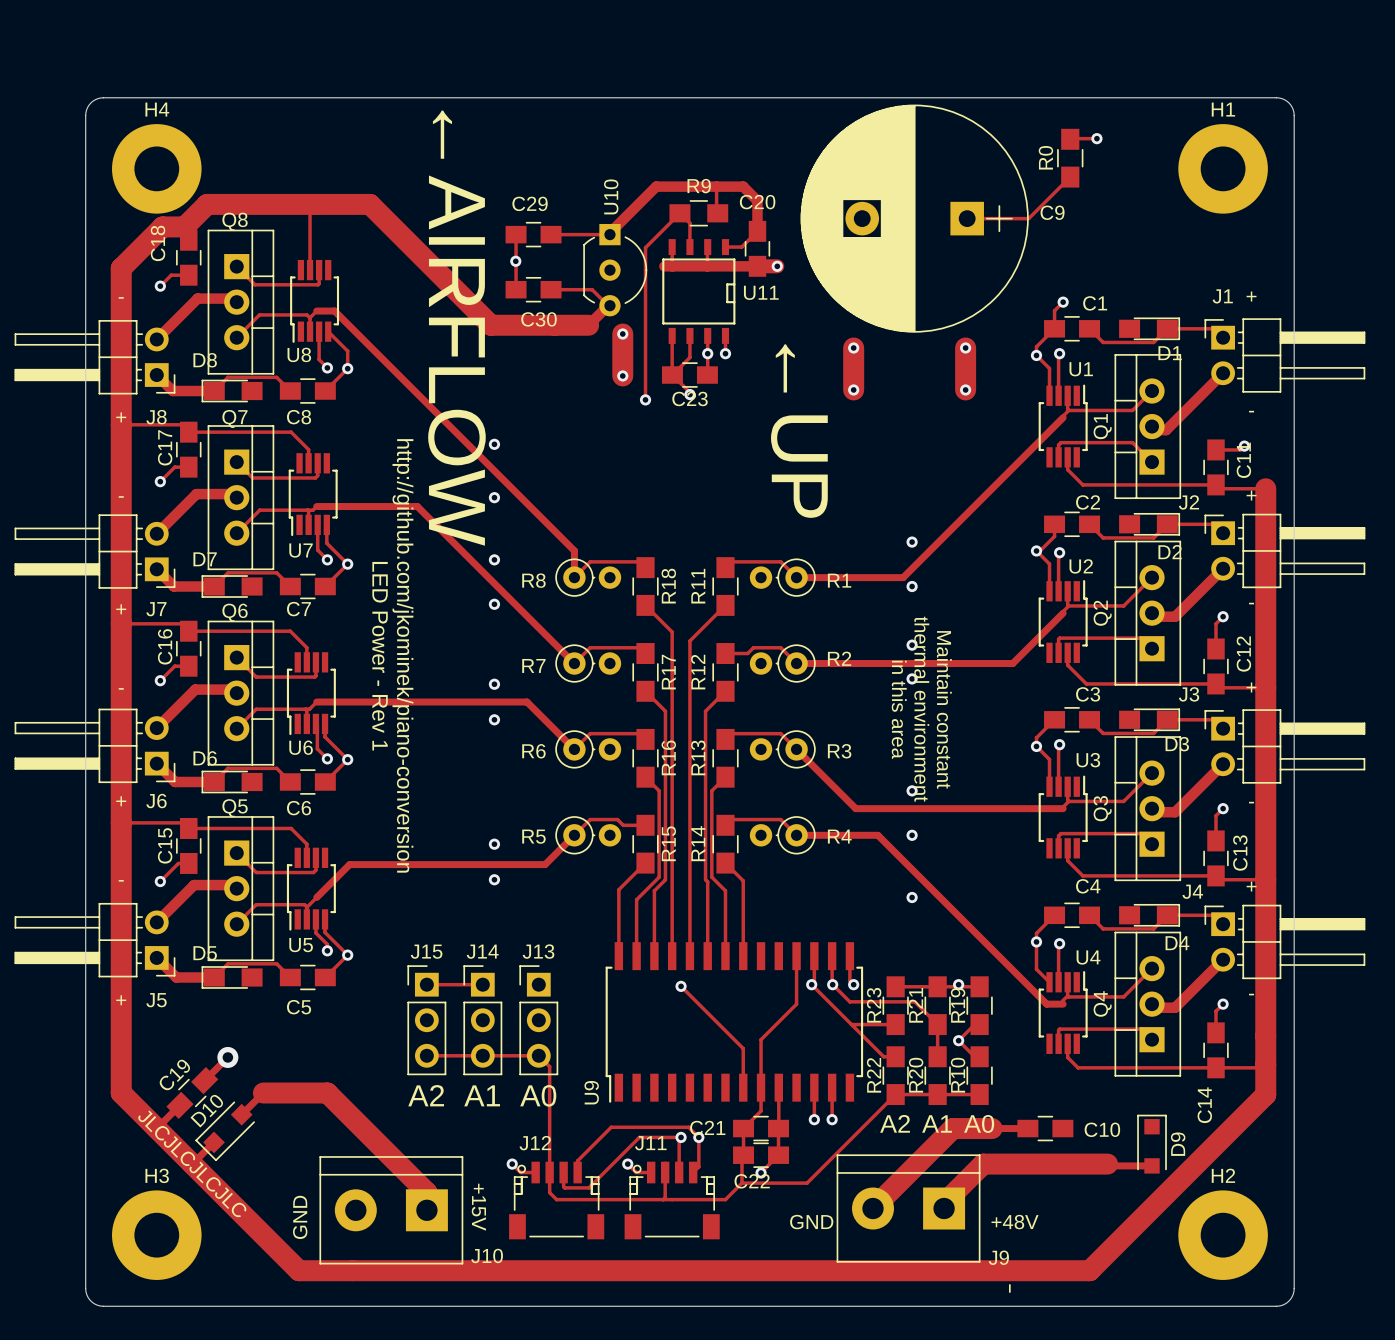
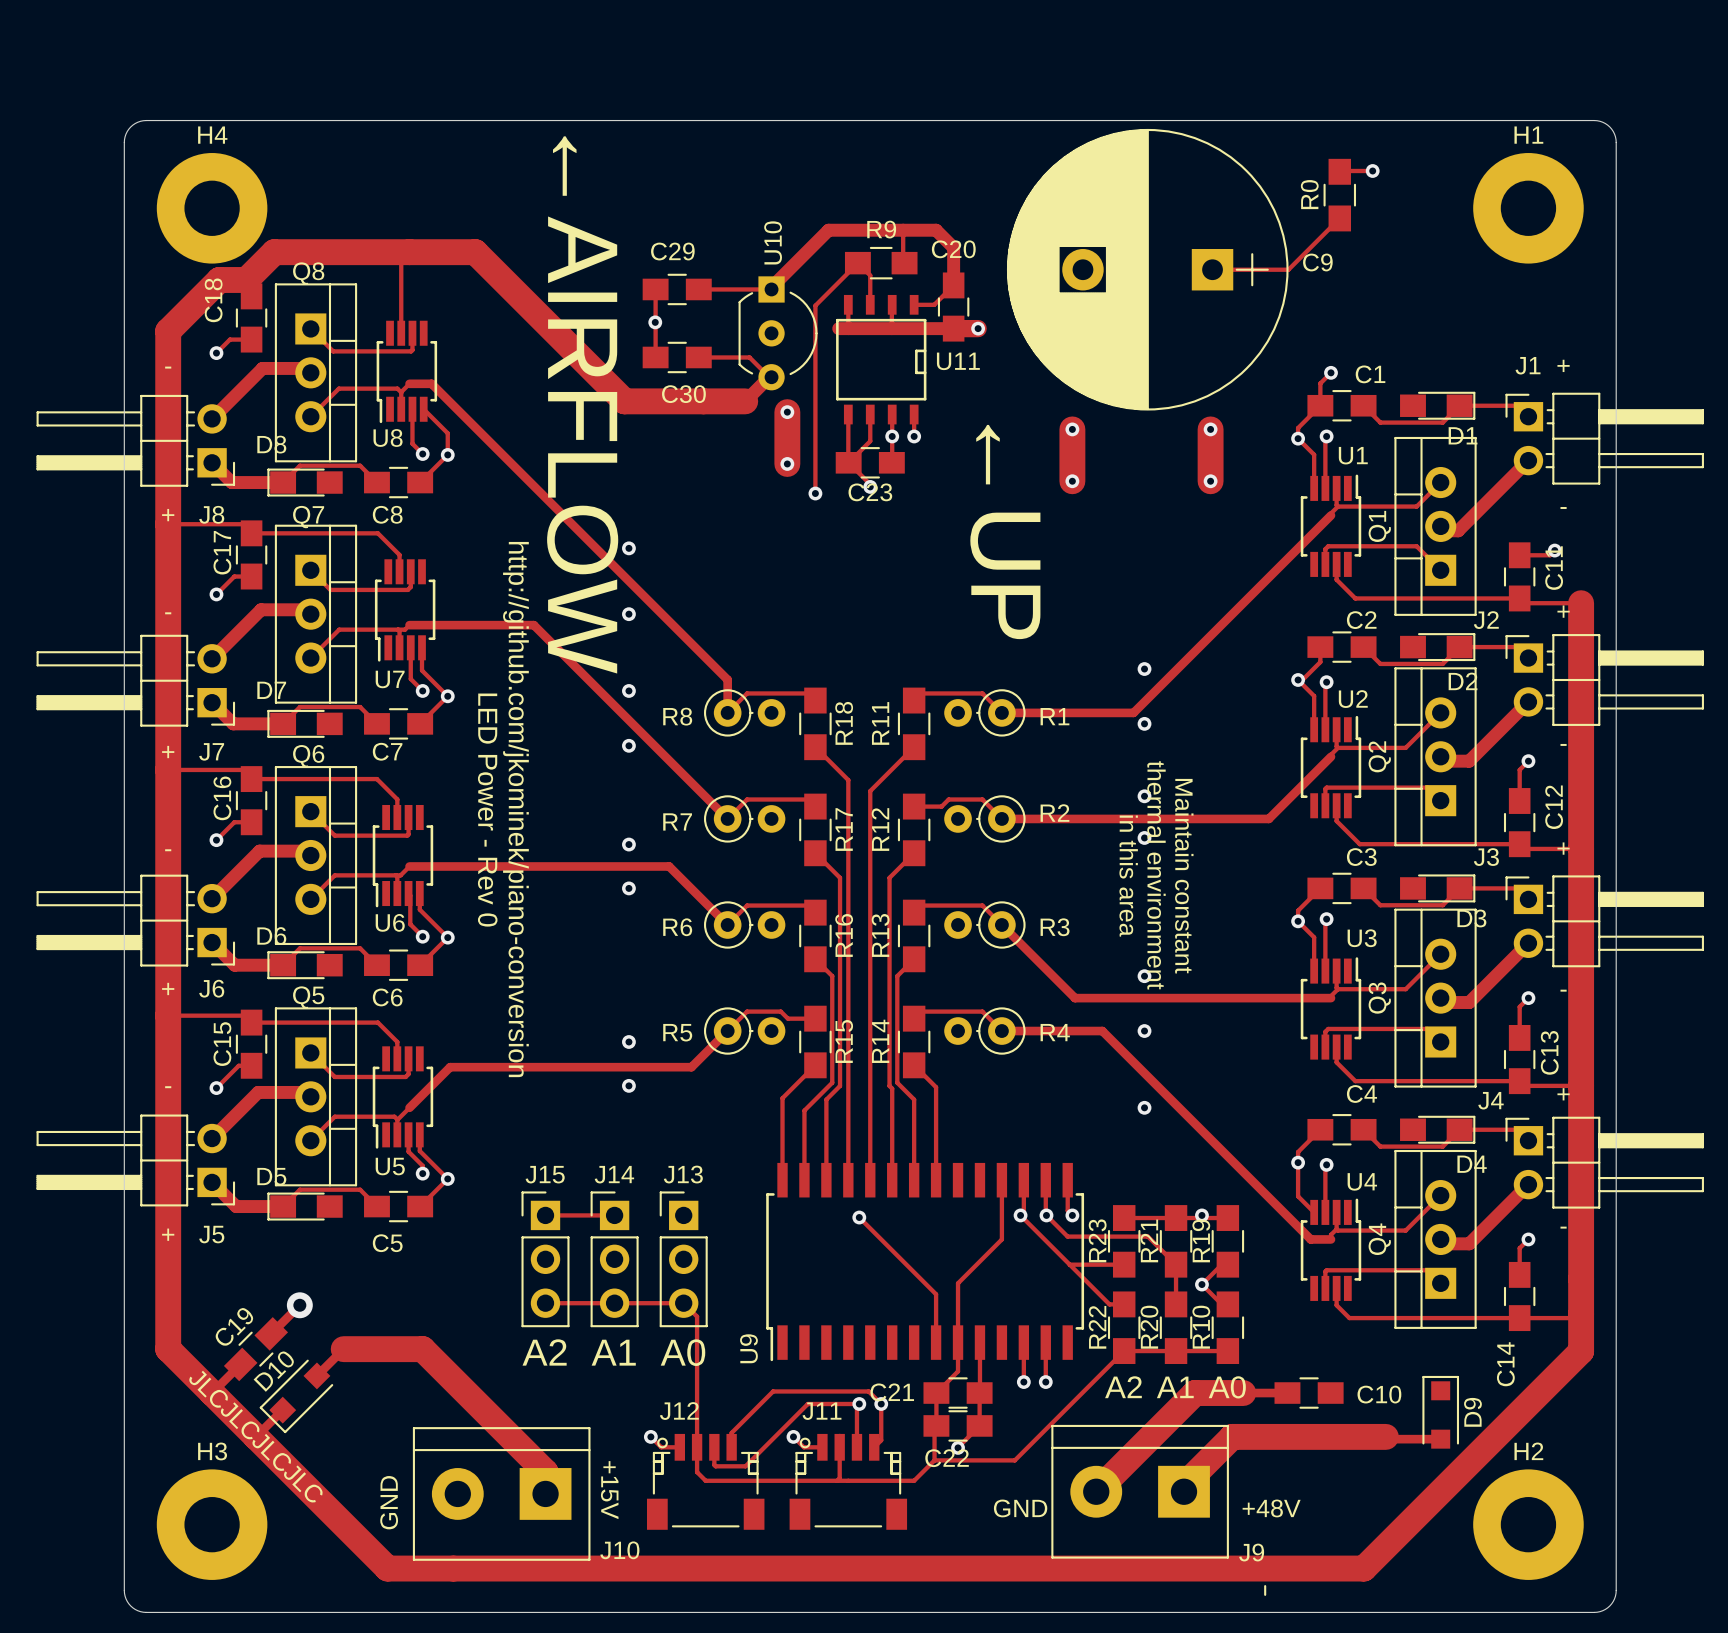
text: LED Power - Rev 1 (379, 656) -> LED Power - Rev 0 (487, 810)

